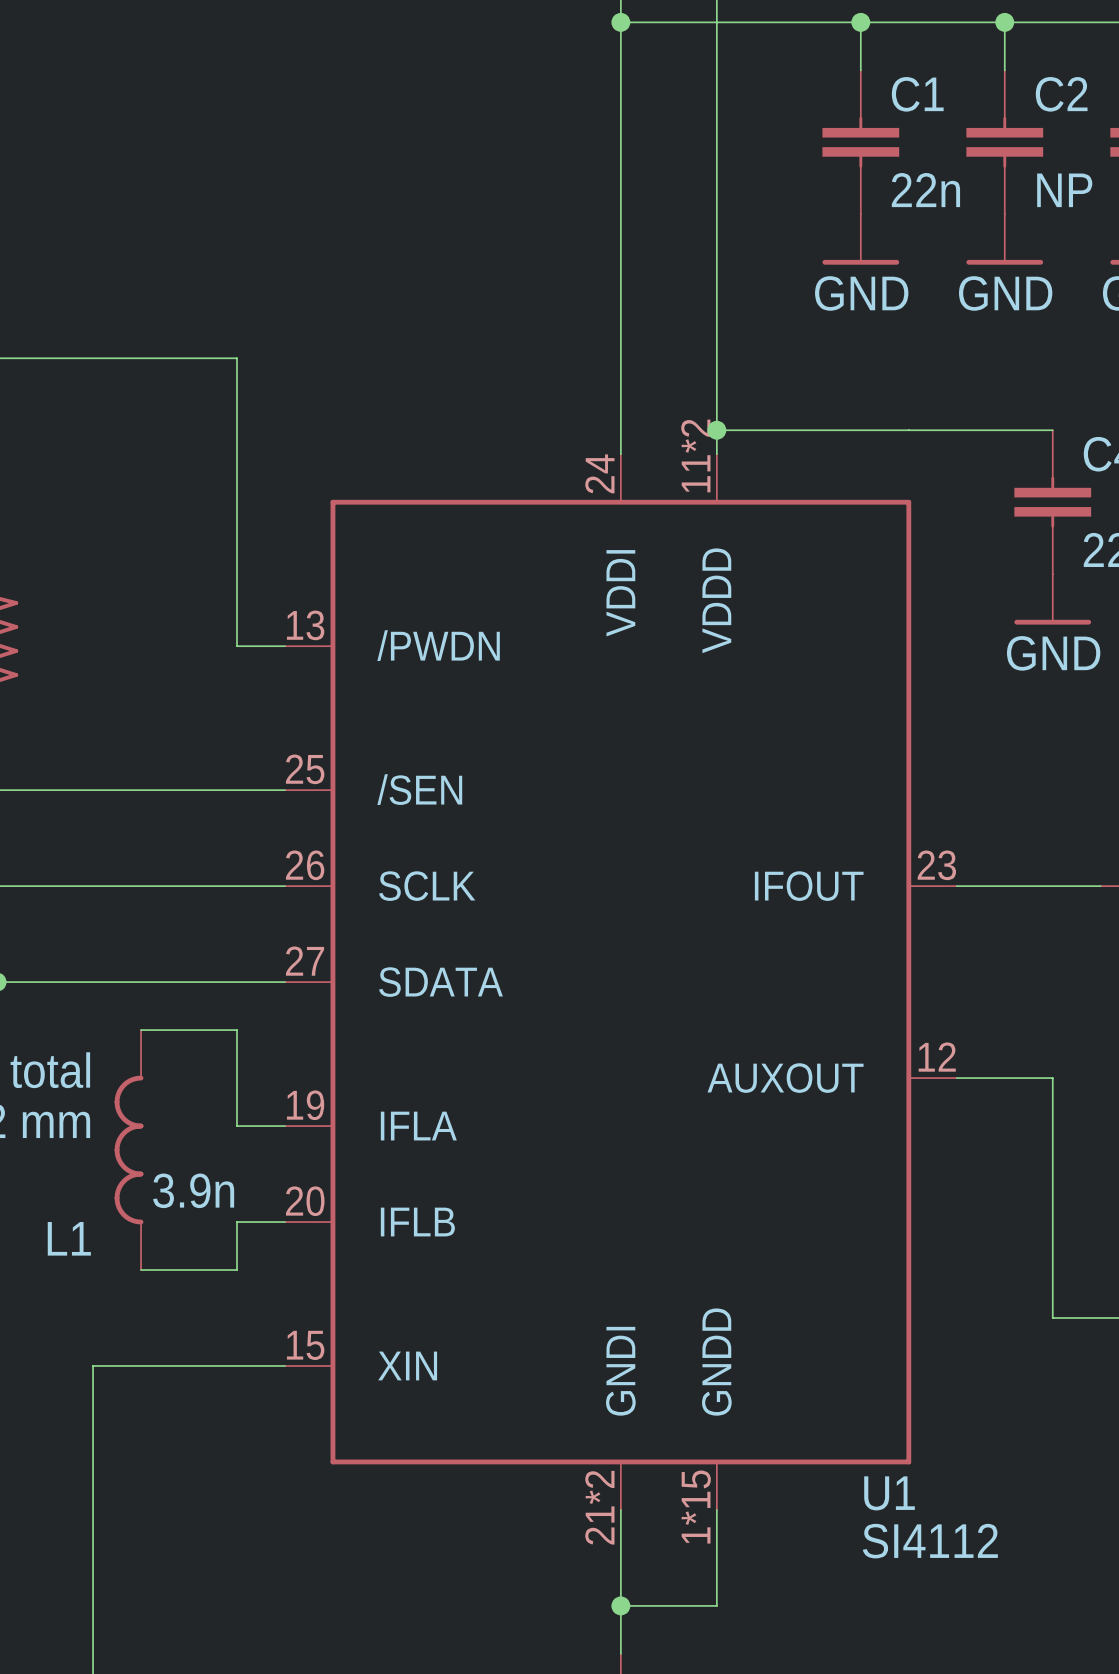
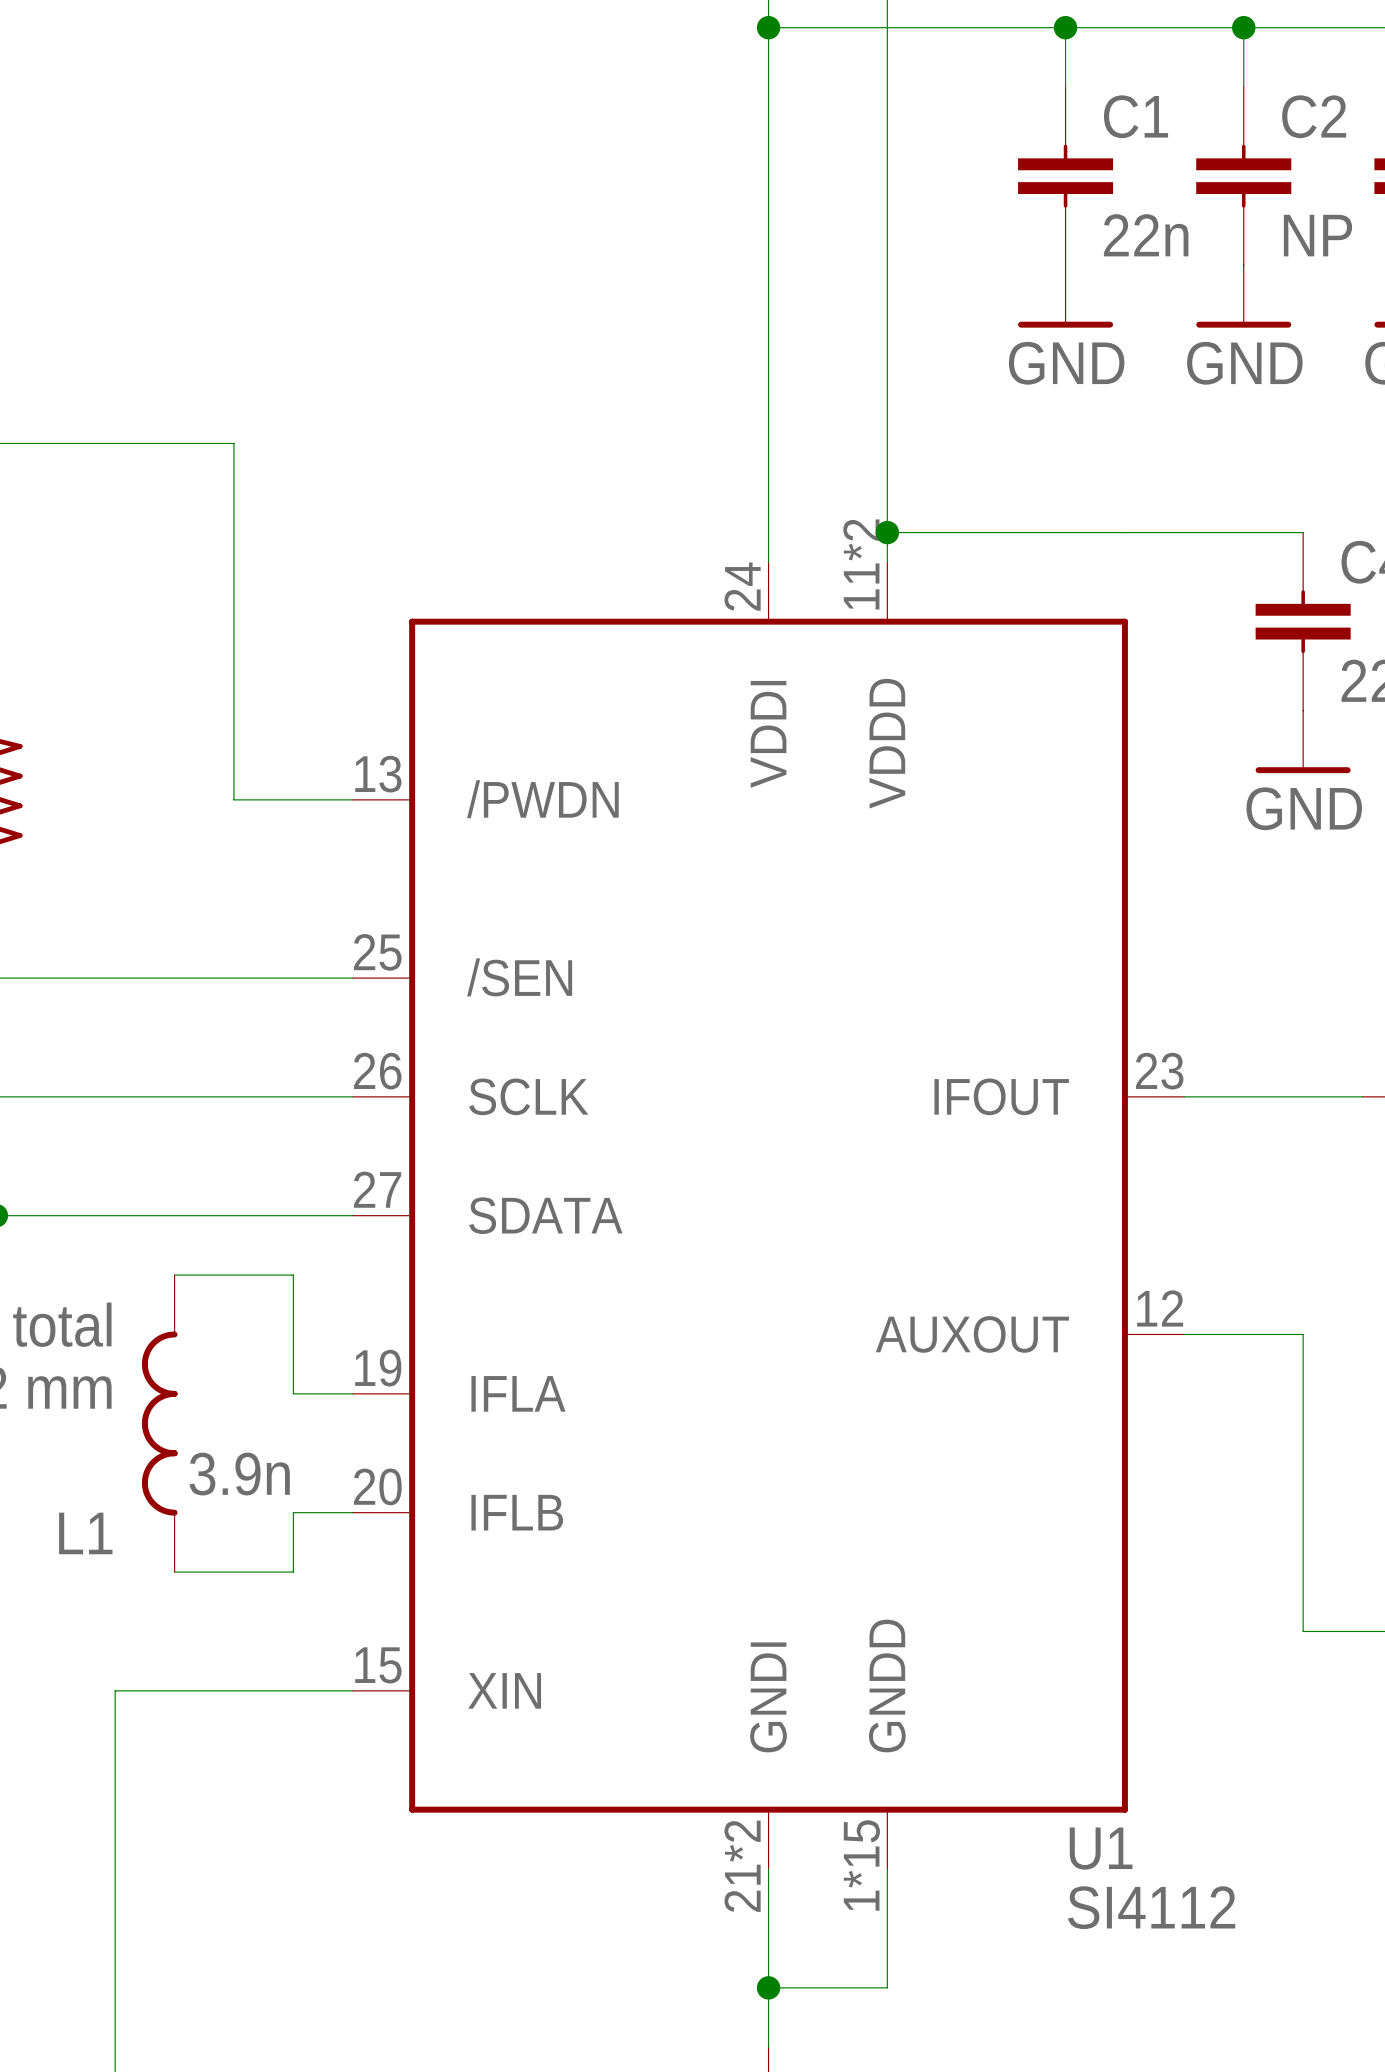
wire: (189, 358) (236, 358) (236, 646) -> (233, 443) (233, 799) (293, 799)

